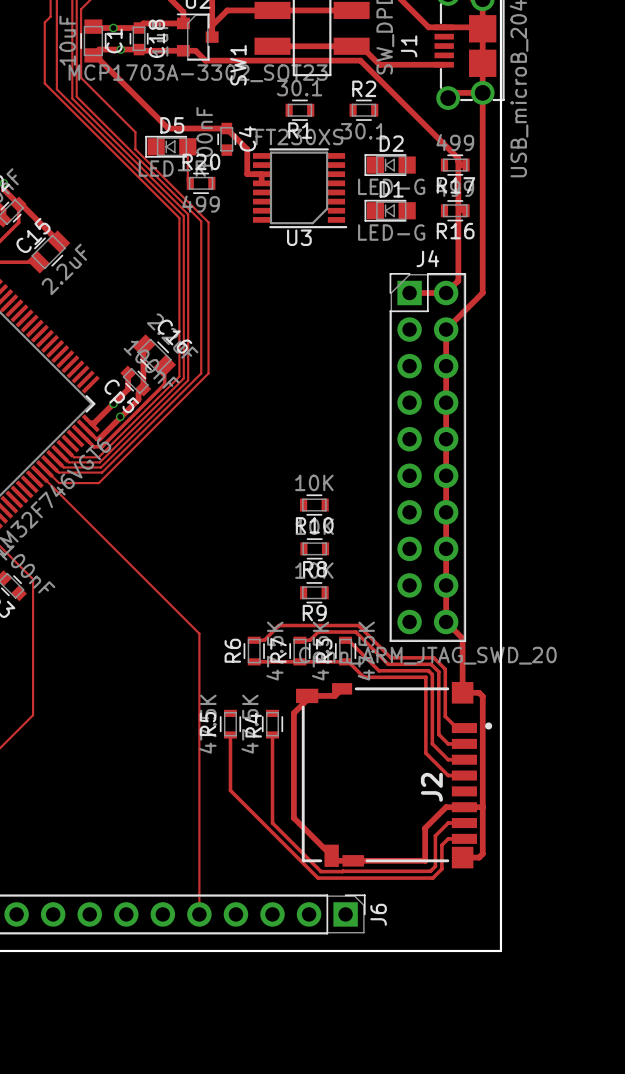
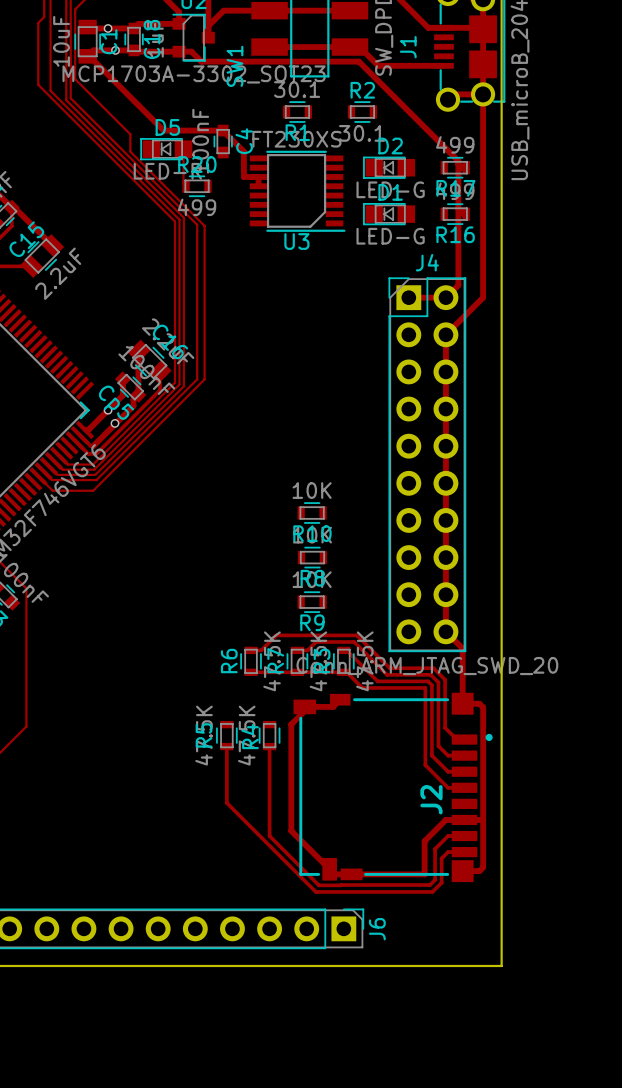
track: (39, 474) (199, 633) (199, 914) -> none

